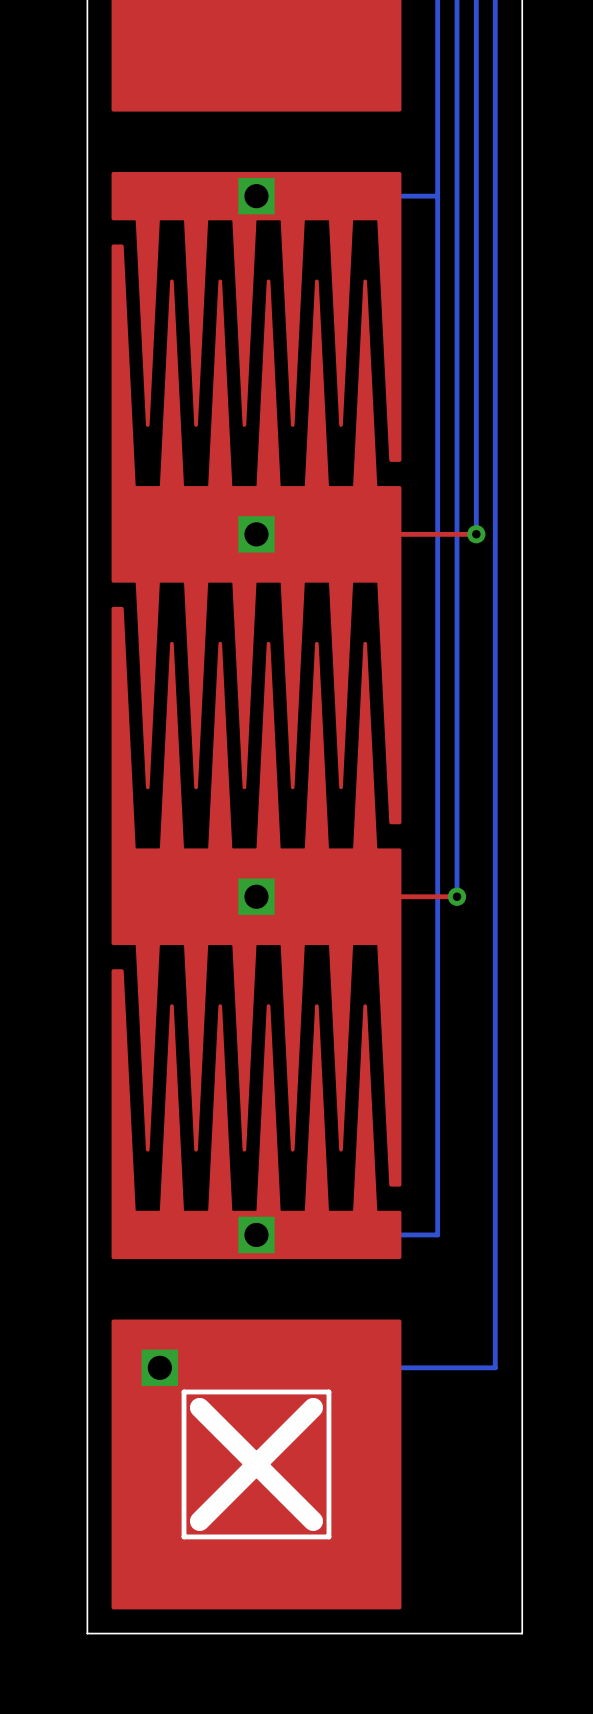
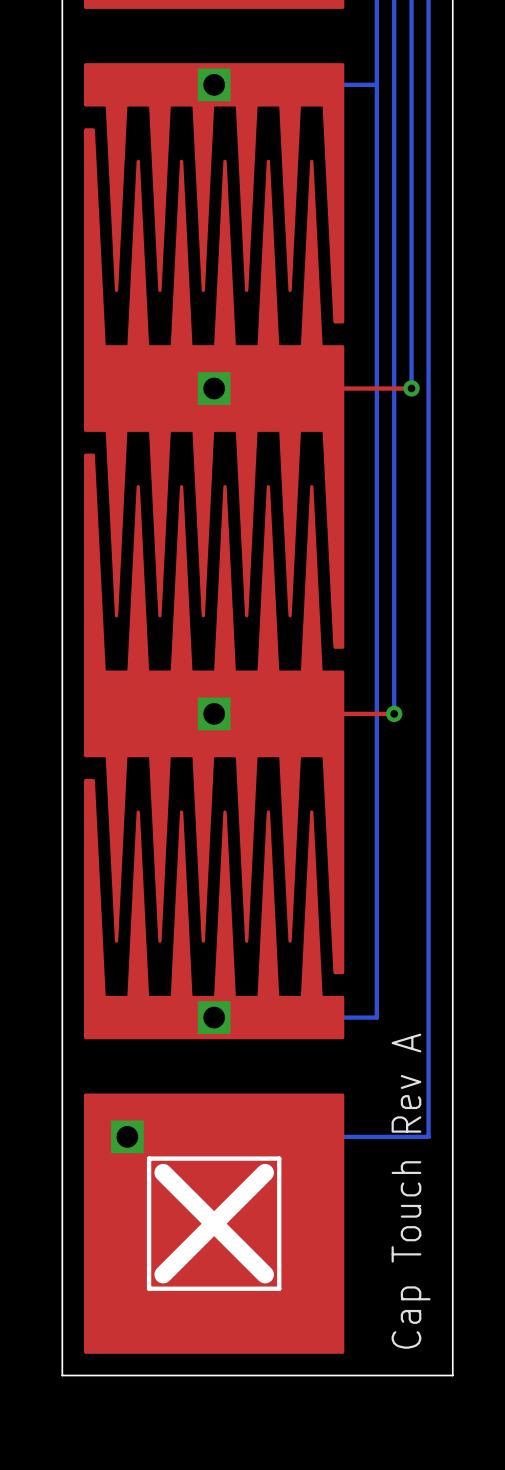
text: none -> Cap Touch Rev A (411, 1191)

